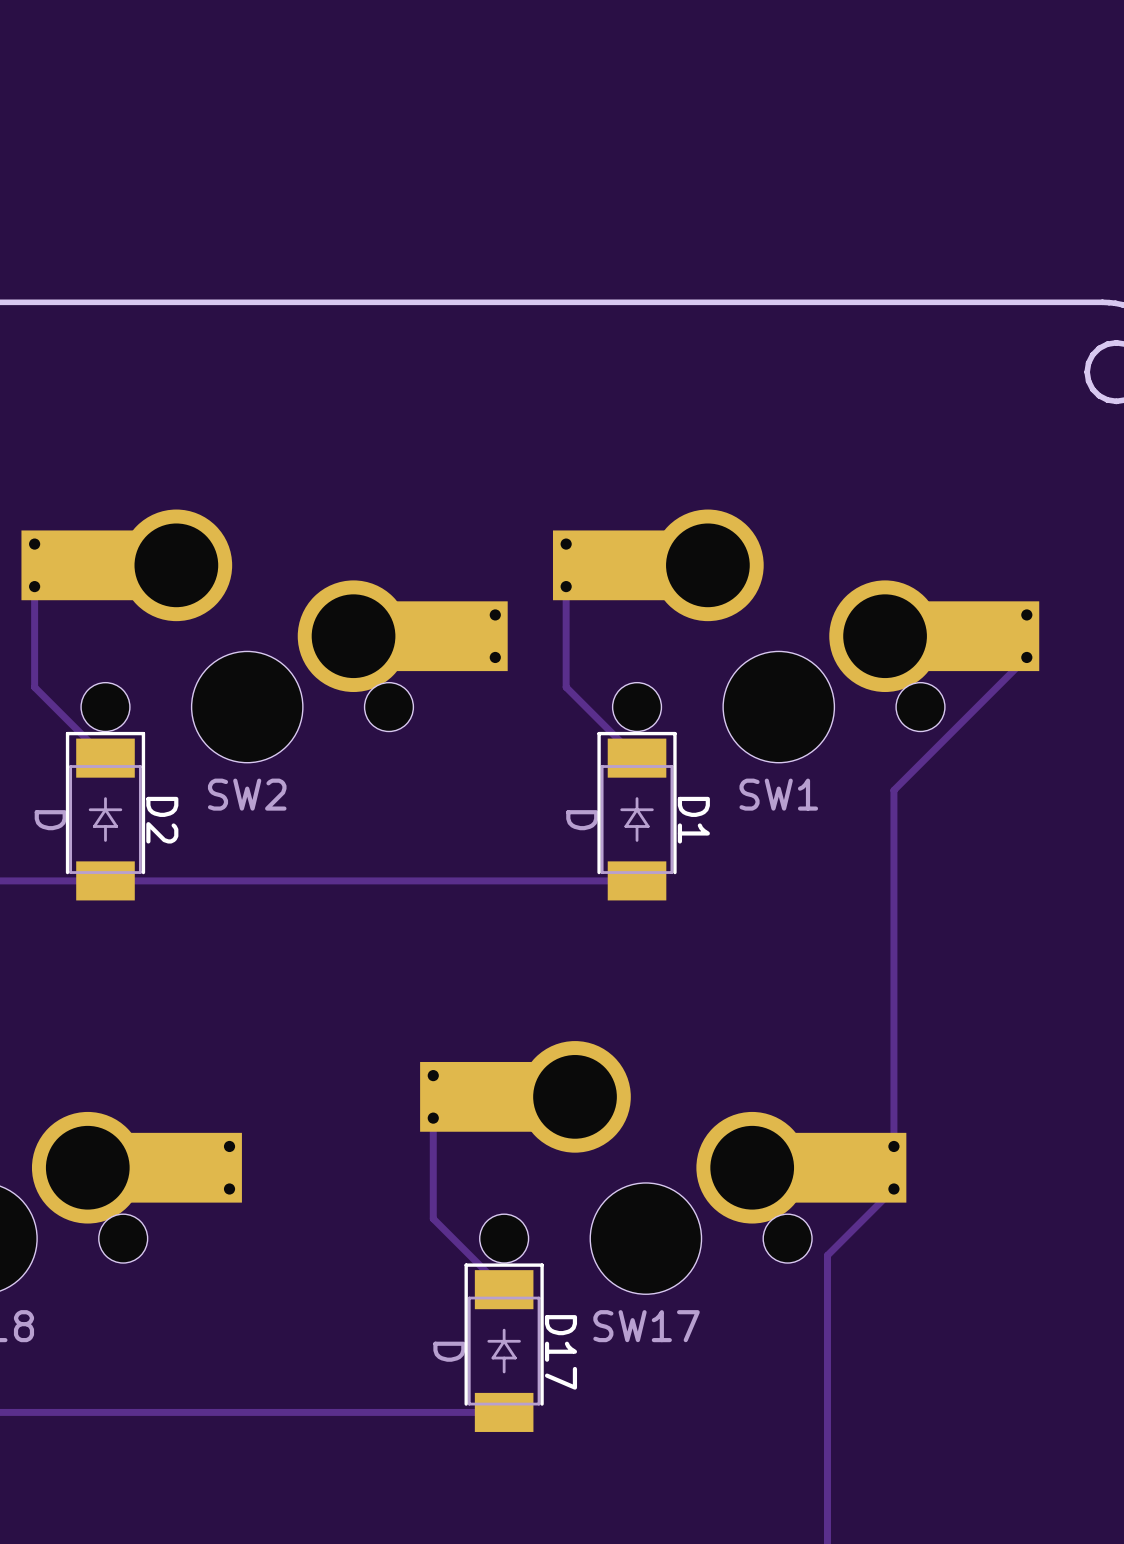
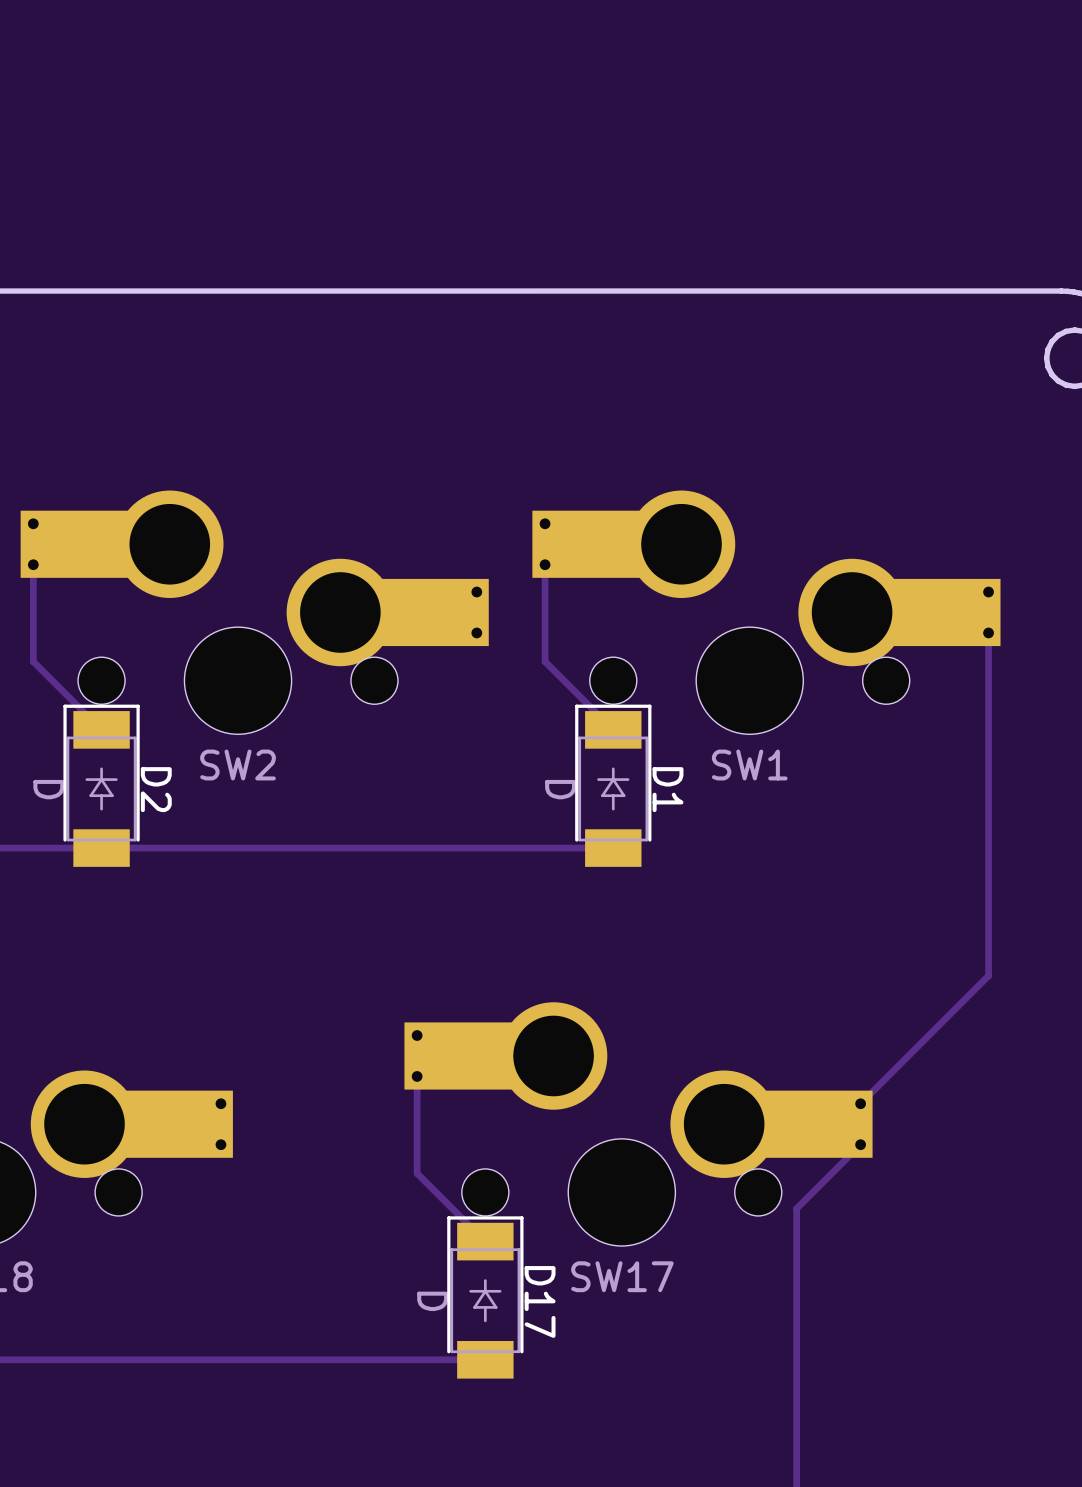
track: (1026, 657) (893, 790) (893, 1146) -> (988, 632) (988, 975) (860, 1103)

